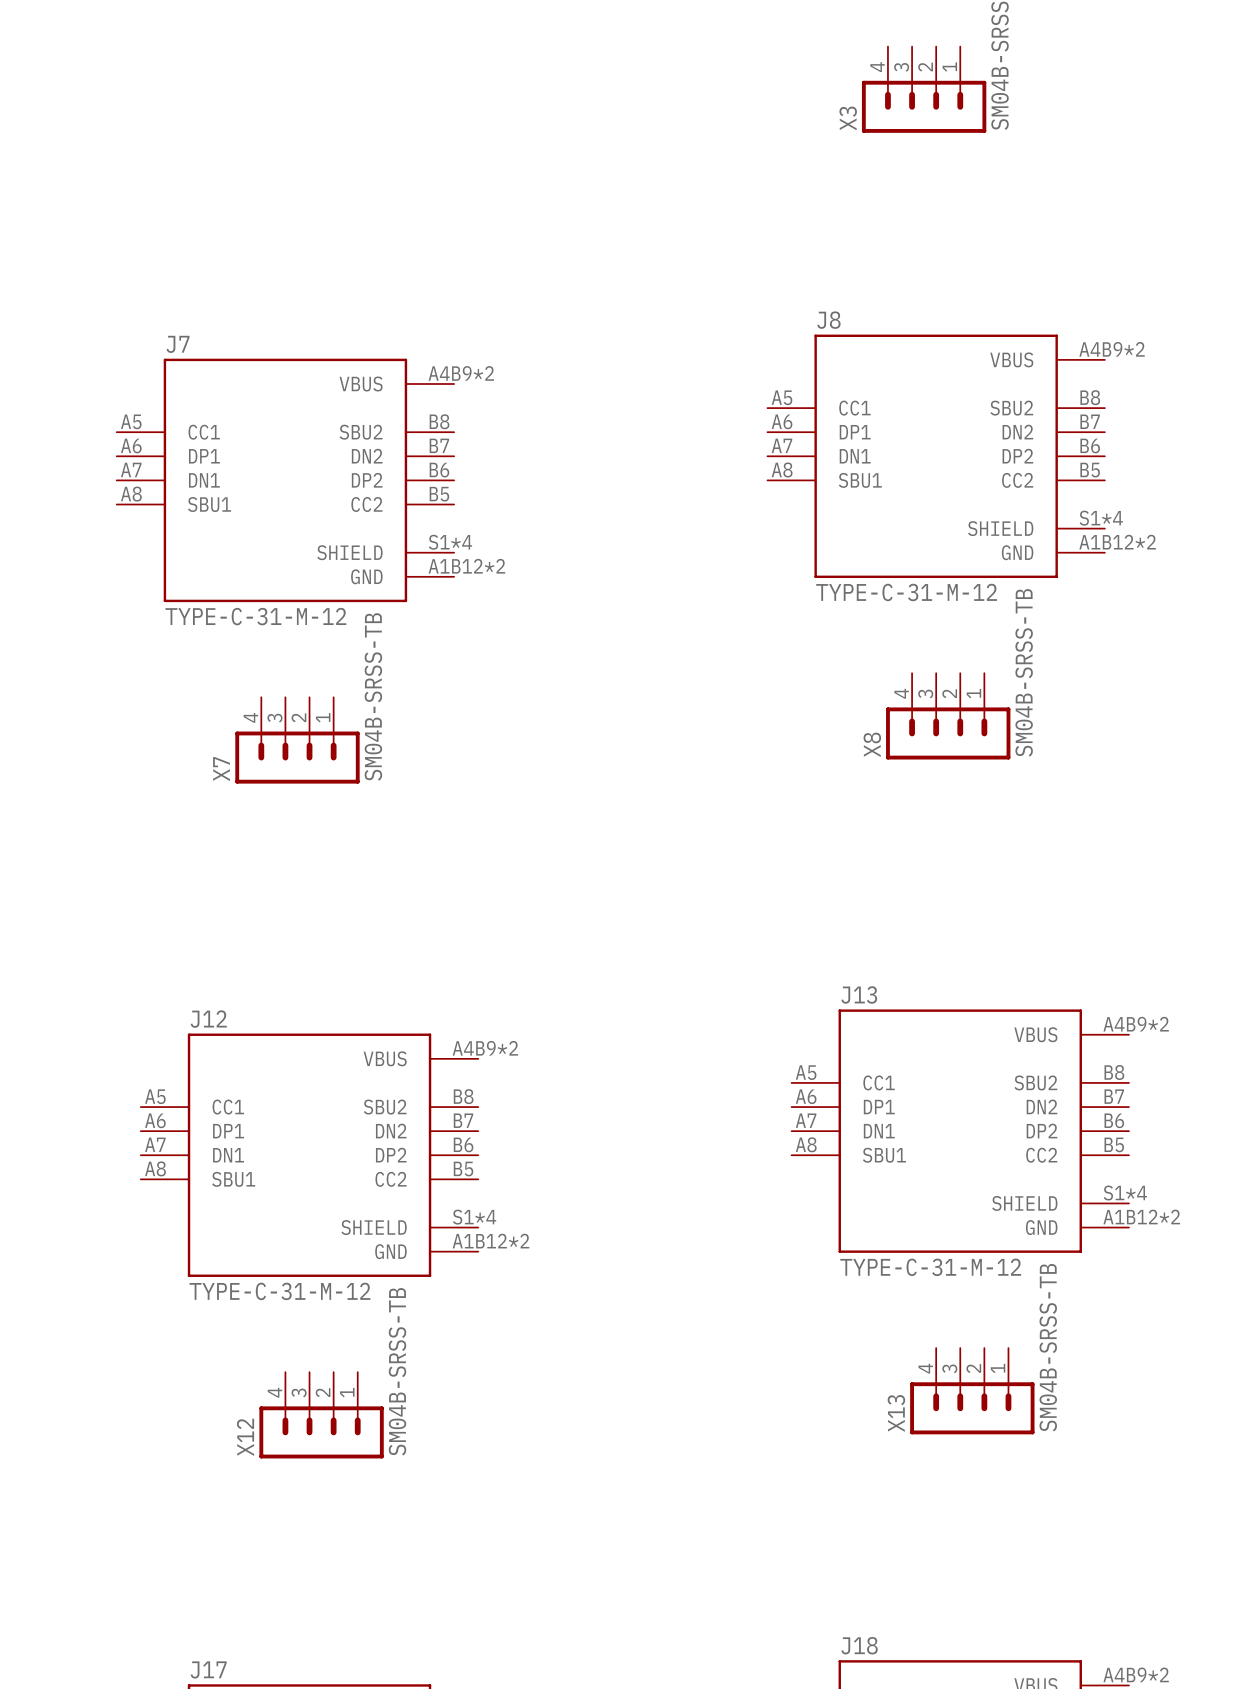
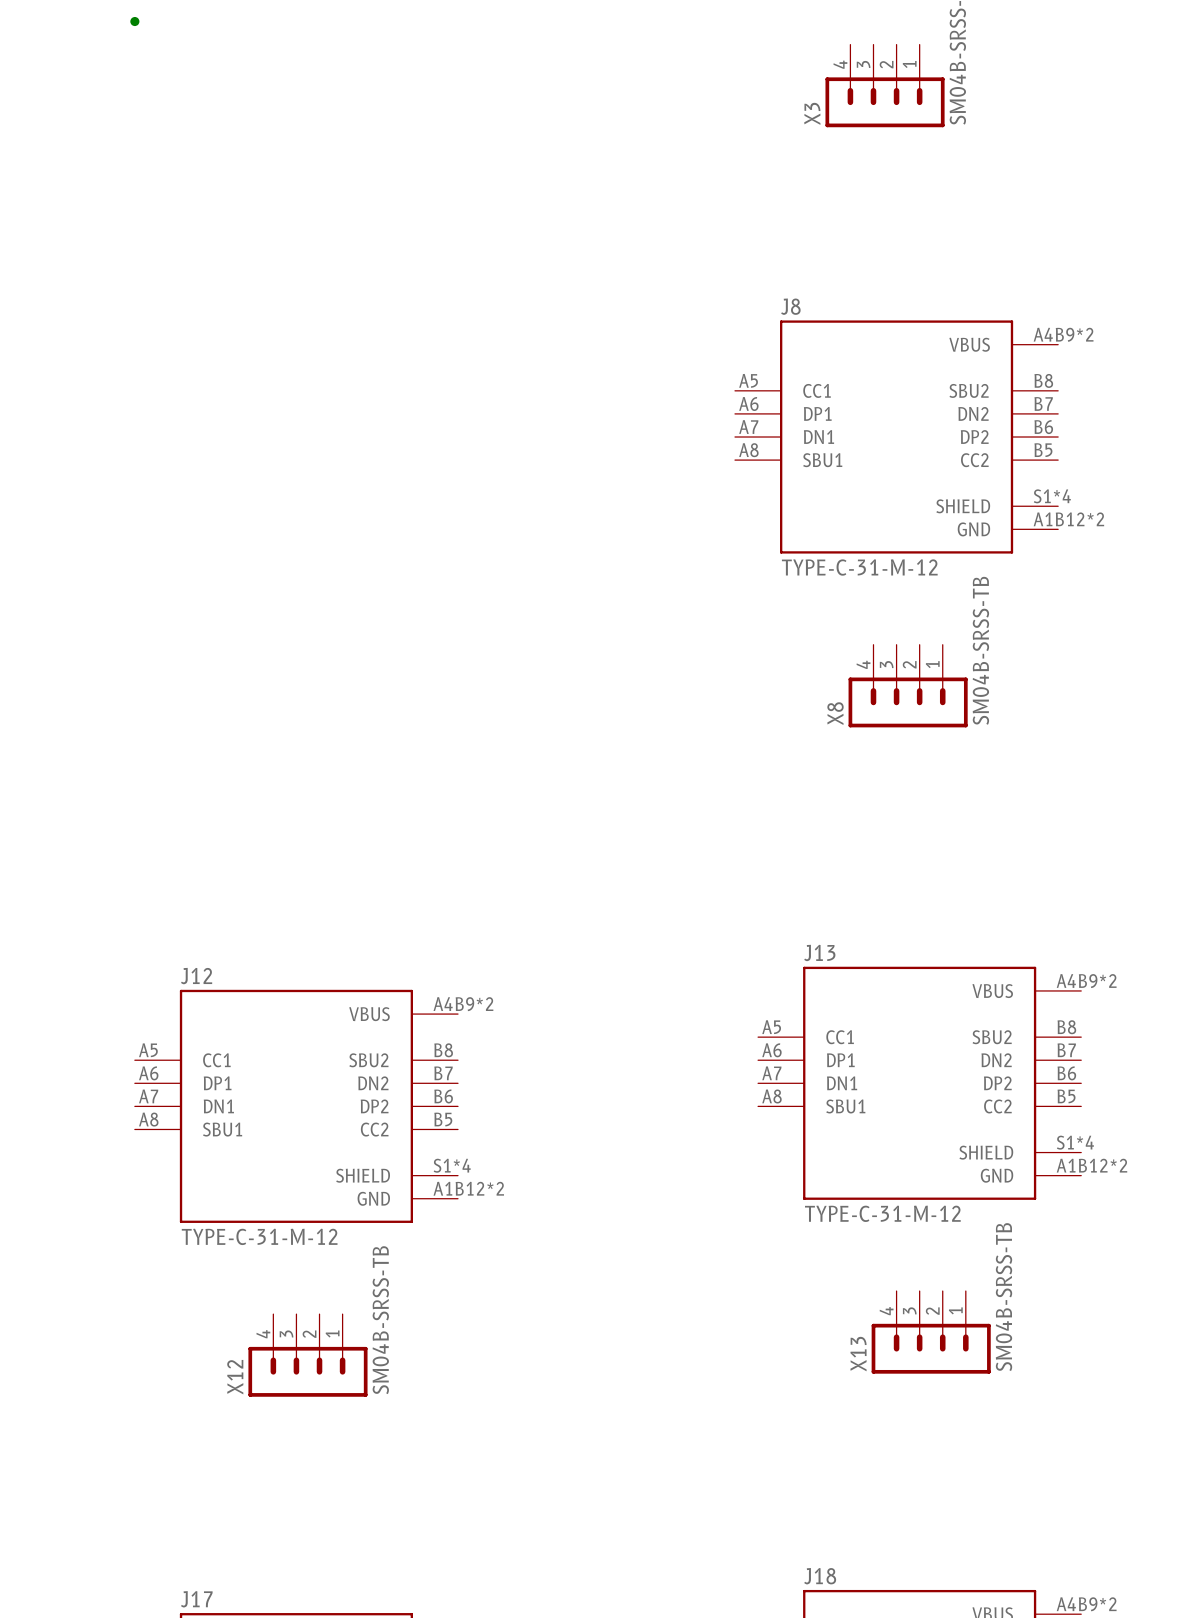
junction: none -> (134, 21)
J7: TYPE-C-31-M-12 (285, 480) -> none
X7: SM04B-SRSS-TB (297, 740) -> none

